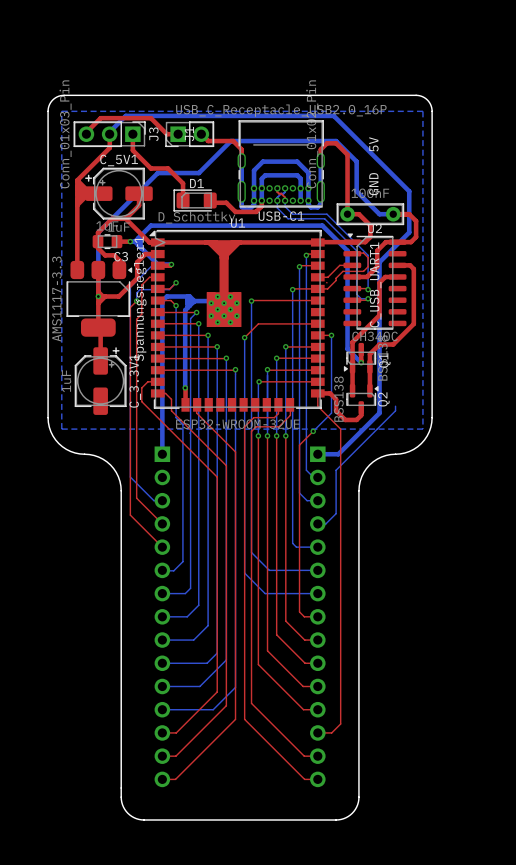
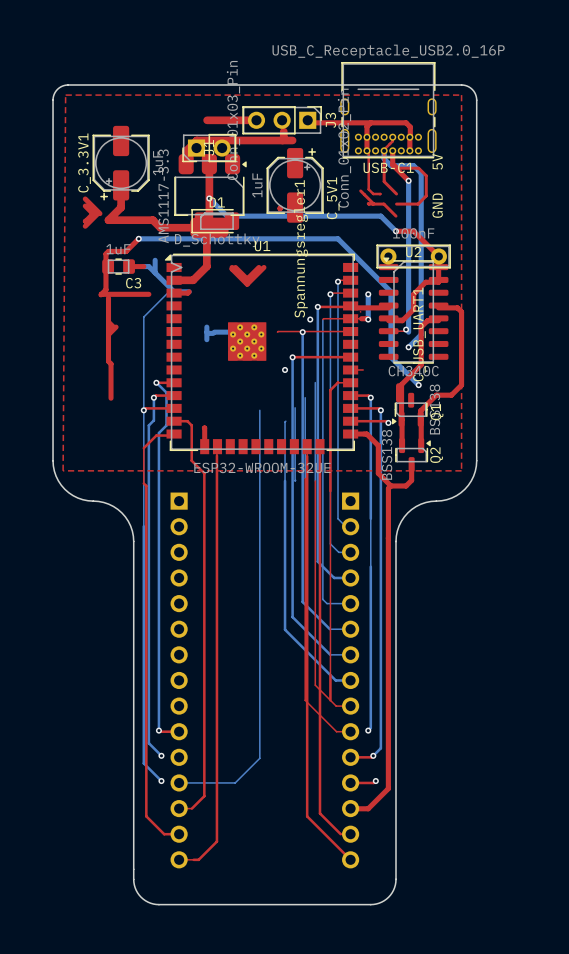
top zone outline: none -> (65, 95) (461, 95) (461, 470) (63, 470) (65, 95)
top track: none -> (207, 120) (256, 120)
top track: none -> (307, 120) (310, 122) (406, 122) (410, 127) (409, 150)
board edge: (48, 111) (52, 100) (64, 95) (416, 95) (427, 100) (432, 111) -> (53, 122) (54, 94) (60, 87) (68, 85) (463, 85) (470, 88) (475, 94) (476, 122)
bottom zone outline: (61, 111) (422, 111) (422, 429) (61, 429) (61, 111) -> none
top track: none -> (370, 122) (367, 126) (367, 150)
top track: none -> (283, 131) (282, 140)
top track: none -> (392, 137) (392, 141) (389, 143)
top track: none -> (292, 140) (196, 140) (186, 151) (186, 164)
top track: none -> (389, 143) (384, 149)
top track: (86, 134) (100, 118) (150, 118) (166, 134) (178, 134) -> none
top track: (109, 134) (109, 147) (77, 180) (77, 271) -> none
bottom track: (109, 134) (125, 115) (333, 115) (409, 191) (409, 232) (379, 262) (379, 413) (338, 454) (317, 454) -> none
J3 position: (109, 134) -> (282, 120)
top track: (132, 134) (132, 150) (150, 168) (168, 168) (183, 183) (183, 200) -> none
top track: (201, 134) (208, 141) (233, 141) (241, 149) (241, 160) -> none
top track: none -> (384, 149) (384, 181) (396, 193)
top track: none -> (367, 150) (368, 152) (368, 189) (373, 193) (380, 194)
bottom track: none -> (384, 150) (384, 158) (390, 165) (413, 165) (421, 173) (421, 334) (408, 347)
text position: 5V (373, 144) -> 5V (437, 161)
top track: none -> (209, 164) (209, 227)
bottom track: (241, 160) (241, 206) (244, 209) (249, 209) (254, 204) (254, 170) (262, 161) (297, 161) (308, 172) (308, 204) (310, 207) (317, 207) (320, 204) (320, 160) -> none
top track: (320, 160) (320, 149) (326, 143) (336, 143) (347, 154) (347, 214) (358, 214) (370, 225) (370, 237) (365, 242) (352, 242) -> none
USB-C1 position: (281, 163) -> (388, 110)
top track: none -> (408, 180) (392, 164) (392, 150) (392, 162) (398, 168) (418, 168) (426, 175) (426, 195) (418, 204) (396, 204)
bottom track: none -> (408, 180) (408, 332)
via: none -> (408, 180)
top track: none -> (121, 185) (121, 207) (108, 220) (152, 220) (160, 227) (209, 227)
top track: none -> (360, 190) (373, 204)
bottom track: none -> (209, 198) (227, 216) (380, 216) (396, 231)
via: none -> (209, 198)
top track: none -> (368, 203) (383, 204) (396, 216)
text position: GND (373, 184) -> GND (437, 205)
bottom track: (285, 188) (285, 192) (277, 197) (277, 208) (288, 218) (324, 218) (356, 250) (356, 294) (361, 298) (368, 298) -> none
top track: (277, 189) (279, 187) (279, 186) (277, 188) (277, 192) (285, 197) (285, 200) -> none
C_5V1 rotation: 0° (118, 193) -> 90° clockwise (295, 185)
C_5V1 position: (118, 193) -> (295, 185)
top track: (139, 193) (139, 205) (125, 218) -> none
top track: (210, 200) (212, 202) (226, 202) (235, 211) (256, 211) (261, 206) (261, 200) -> none
bottom track: (261, 200) (261, 178) (265, 175) (297, 175) (300, 178) (300, 200) -> none
bottom track: (285, 200) (285, 206) (292, 214) (326, 214) (368, 255) (368, 289) -> none
top track: none -> (396, 231) (413, 231) (438, 256) (438, 282) (425, 282) (413, 294) (413, 309) (402, 320) (388, 320)
via: none -> (396, 231)
C_USB_UART1 position: (370, 214) -> (413, 256)
top track: (393, 214) (409, 214) (416, 221) (416, 237) (411, 242) (385, 242) (377, 250) (377, 266) (367, 276) (352, 276) -> none
bottom track: (393, 214) (379, 214) (356, 191) (356, 161) (336, 141) (230, 141) (198, 173) (157, 173) (98, 232) (98, 296) -> none
top track: none -> (138, 238) (126, 251) (108, 251) (105, 253) (105, 289) (100, 294)
bottom track: none -> (138, 238) (337, 238) (390, 291) (390, 357) (418, 385)
top track: (125, 218) (149, 242) (347, 242) -> none
top track: (125, 218) (112, 218) (98, 232) (98, 248) (105, 255) (114, 255) (119, 260) (119, 269) -> none
via position: (130, 241) -> (138, 238)
bottom track: (134, 241) (150, 225) (322, 225) (347, 250) (347, 349) (361, 362) -> none
top track: (224, 246) (224, 296) -> none
top track: (352, 253) (363, 253) (368, 257) (368, 266) (363, 271) (342, 271) (327, 288) -> (368, 319) (361, 318)
top track: (157, 254) (145, 254) (137, 262) (137, 278) (118, 296) (98, 296) -> (174, 280) (193, 280) (206, 266) (206, 230) (209, 227)
via: (171, 264) -> none
top track: (352, 265) (339, 265) (327, 277) (317, 277) -> none
top track: (397, 265) (410, 265) (413, 269) (413, 323) (393, 344) (379, 344) (369, 354) (369, 390) -> none
top track: none -> (101, 294) (148, 294)
bottom track: none -> (368, 294) (368, 319)
via: none -> (368, 294)
top track: (397, 276) (385, 276) (379, 282) (379, 315) (352, 342) (352, 390) -> none
top track: (157, 277) (149, 277) (141, 285) (141, 314) (136, 319) (136, 498) (162, 523) -> none
top track: none -> (317, 306) (388, 307)
bottom track: none -> (317, 306) (317, 561) (334, 577) (350, 577)
via: none -> (317, 306)
top track: none -> (438, 307) (457, 307) (461, 311) (461, 385) (451, 395) (436, 395) (420, 410) (421, 445)
top track: (176, 282) (169, 288) (157, 288) -> none
bottom track: (176, 282) (169, 289) (139, 289) (136, 292) (136, 301) -> none
via: (176, 282) -> none
via: none -> (310, 319)
via: (292, 289) -> none
via: none -> (368, 319)
via: (368, 289) -> none
top track: none -> (438, 320) (427, 320) (421, 327) (421, 364) (401, 384) (402, 445)
via: (98, 296) -> none
Spannungsregler1 position: (99, 298) -> (210, 195)
Spannungsregler1 name position: Spannungsregler1 (140, 298) -> Spannungsregler1 (301, 248)
top track: (157, 300) (170, 300) (176, 305) -> none
top track: (136, 301) (130, 307) (130, 406) -> (174, 434) (156, 435) (143, 448)
via: (136, 301) -> none
bottom track: (251, 301) (251, 552) (269, 570) (299, 570) -> (302, 332) (302, 601) (329, 629)
via: (251, 301) -> none
via: none -> (302, 332)
bottom track: (176, 305) (176, 417) (182, 424) (182, 561) (173, 570) (162, 570) -> none
via: (176, 305) -> none
top track: (158, 312) (195, 313) -> none
bottom track: (196, 312) (190, 318) (190, 588) (185, 593) (162, 593) -> none
via: (196, 312) -> none
via: none -> (408, 347)
top track: (157, 323) (198, 323) -> none
bottom track: (198, 323) (198, 605) (187, 616) (162, 616) -> none
via: (198, 323) -> none
via: none -> (292, 357)
top track: (317, 323) (258, 323) (244, 337) -> (350, 357) (292, 357)
top track: (157, 335) (208, 335) -> none
bottom track: (208, 335) (208, 625) (193, 640) (162, 640) -> none
via: (208, 335) -> none
via: none -> (285, 369)
bottom track: (331, 335) (331, 413) (313, 431) -> none
via: (331, 335) -> none
bottom track: (244, 337) (244, 573) (265, 593) (299, 593) -> (292, 357) (292, 617) (330, 654)
via: (244, 337) -> none
bottom track: none -> (156, 382) (166, 392) (166, 425) (158, 433) (158, 730)
via: none -> (156, 382)
top track: (217, 346) (157, 346) -> (156, 382) (174, 382)
bottom track: (217, 346) (217, 653) (207, 663) (162, 663) -> none
via: (217, 346) -> none
top track: (285, 346) (306, 346) -> none
via: (285, 346) -> none
via: none -> (418, 385)
top track: (226, 358) (157, 358) -> (153, 397) (156, 395) (174, 395)
bottom track: (226, 358) (226, 659) (199, 686) (162, 686) -> none
via: (226, 358) -> none
top track: (276, 358) (317, 358) -> (370, 397) (368, 395) (350, 395)
via: (276, 358) -> none
Q1 position: (359, 358) -> (409, 409)
bottom track: none -> (153, 397) (153, 420) (148, 425) (148, 743) (161, 755)
via: none -> (153, 397)
via: none -> (370, 397)
via: (361, 362) -> none
via: (235, 369) -> none
via: (267, 369) -> none
top track: (157, 370) (233, 370) (235, 371) -> (174, 408) (145, 408) (143, 410)
top track: (265, 370) (317, 370) -> (380, 410) (378, 408) (350, 408)
via: none -> (143, 410)
bottom track: none -> (380, 410) (380, 748) (373, 755)
via: none -> (380, 410)
C_3.3V1 rotation: 0° (100, 381) -> 180° (121, 163)
C_3.3V1 position: (100, 381) -> (121, 163)
top track: (157, 381) (147, 381) (141, 387) (141, 401) (217, 477) (217, 691) (176, 732) (173, 732) -> (174, 421) (187, 421) (191, 425) (191, 460) (204, 473) (204, 796) (191, 808)
top track: (258, 381) (317, 381) -> (388, 422) (386, 421) (350, 421)
via: (259, 381) -> none
via: none -> (388, 422)
bottom track: (185, 387) (185, 310) (194, 301) (189, 296) (166, 296) (162, 301) (162, 454) -> none
via: (185, 387) -> none
top track: (157, 393) (165, 393) (171, 399) (171, 410) (226, 465) (226, 705) (175, 756) (162, 756) -> (143, 483) (146, 485) (146, 816) (164, 834) (179, 834)
top track: (317, 393) (317, 406) (340, 429) (340, 723) (331, 732) (317, 732) -> (388, 538) (388, 788) (368, 808) (350, 808)
top track: (330, 393) (336, 399) (336, 410) (345, 419) (356, 419) (361, 415) (361, 407) -> (364, 434) (366, 434) (378, 445) (378, 473) (390, 485)
Q2 position: (362, 399) -> (413, 455)
top track: (290, 404) (290, 415) (278, 426) (256, 426) (251, 431) (251, 703) (304, 756) (308, 756) -> (319, 446) (319, 813) (340, 834)
bottom track: (395, 406) (395, 410) (336, 470) -> (370, 397) (370, 518)
top track: (196, 413) (235, 451) (235, 719) (175, 779) -> (216, 455) (216, 841) (198, 859) (193, 859)
top track: (278, 413) (274, 417) (253, 417) (244, 426) (244, 719) (304, 779) (317, 779) -> (307, 456) (307, 816) (350, 859)
top track: none -> (411, 464) (411, 480) (406, 485) (390, 485)
top track: (313, 431) (299, 445) -> (338, 382) (330, 390) (330, 491)
via: (313, 431) -> none
bottom track: (190, 432) (189, 433) -> none
top track: (258, 435) (258, 664) (303, 709) (317, 709) -> (375, 781) (373, 782) (350, 782)
bottom track: none -> (285, 480) (285, 629) (335, 680) (350, 680)
via: (258, 435) -> none
top track: (267, 435) (267, 650) (303, 686) (317, 686) -> (373, 755) (350, 757)
via: (267, 435) -> none
via: (276, 435) -> none
via: (285, 435) -> none
top track: (130, 438) (130, 515) (162, 547) -> none
top track: none -> (390, 485) (388, 488) (388, 538)
bottom track: (130, 477) (153, 500) (162, 500) -> (143, 526) (143, 763) (161, 781)
bottom track: (336, 513) (325, 523) (317, 523) -> (370, 566) (370, 728) (368, 730)
top track: (299, 611) (304, 616) (317, 616) -> (330, 675) (330, 700)
top track: none -> (158, 730) (179, 731)
via: none -> (158, 730)
via: none -> (368, 730)
via: none -> (161, 755)
via: none -> (373, 755)
via: none -> (161, 781)
via: none -> (375, 781)

